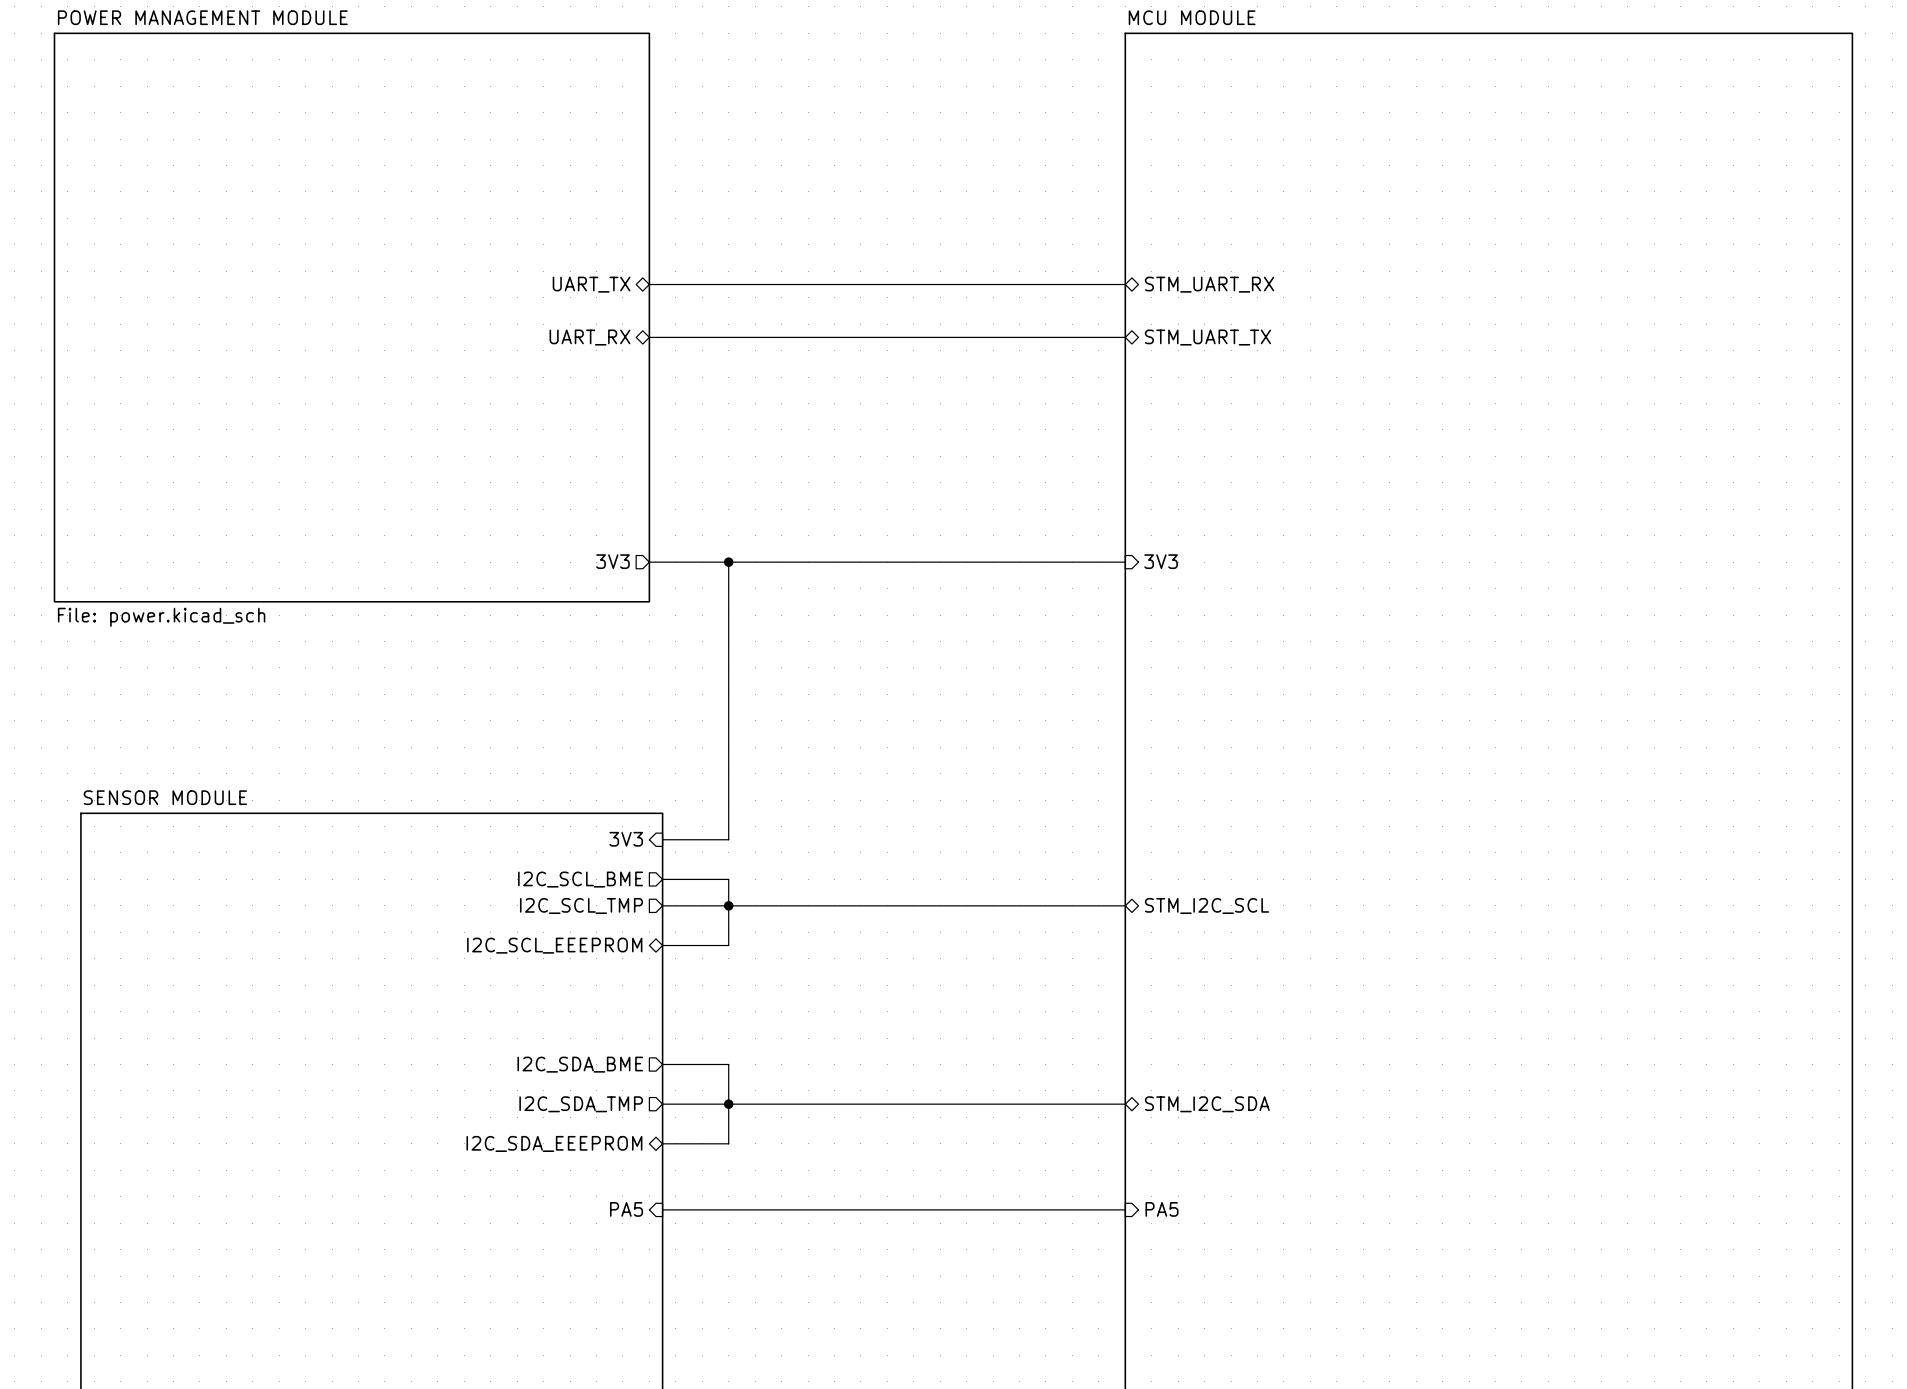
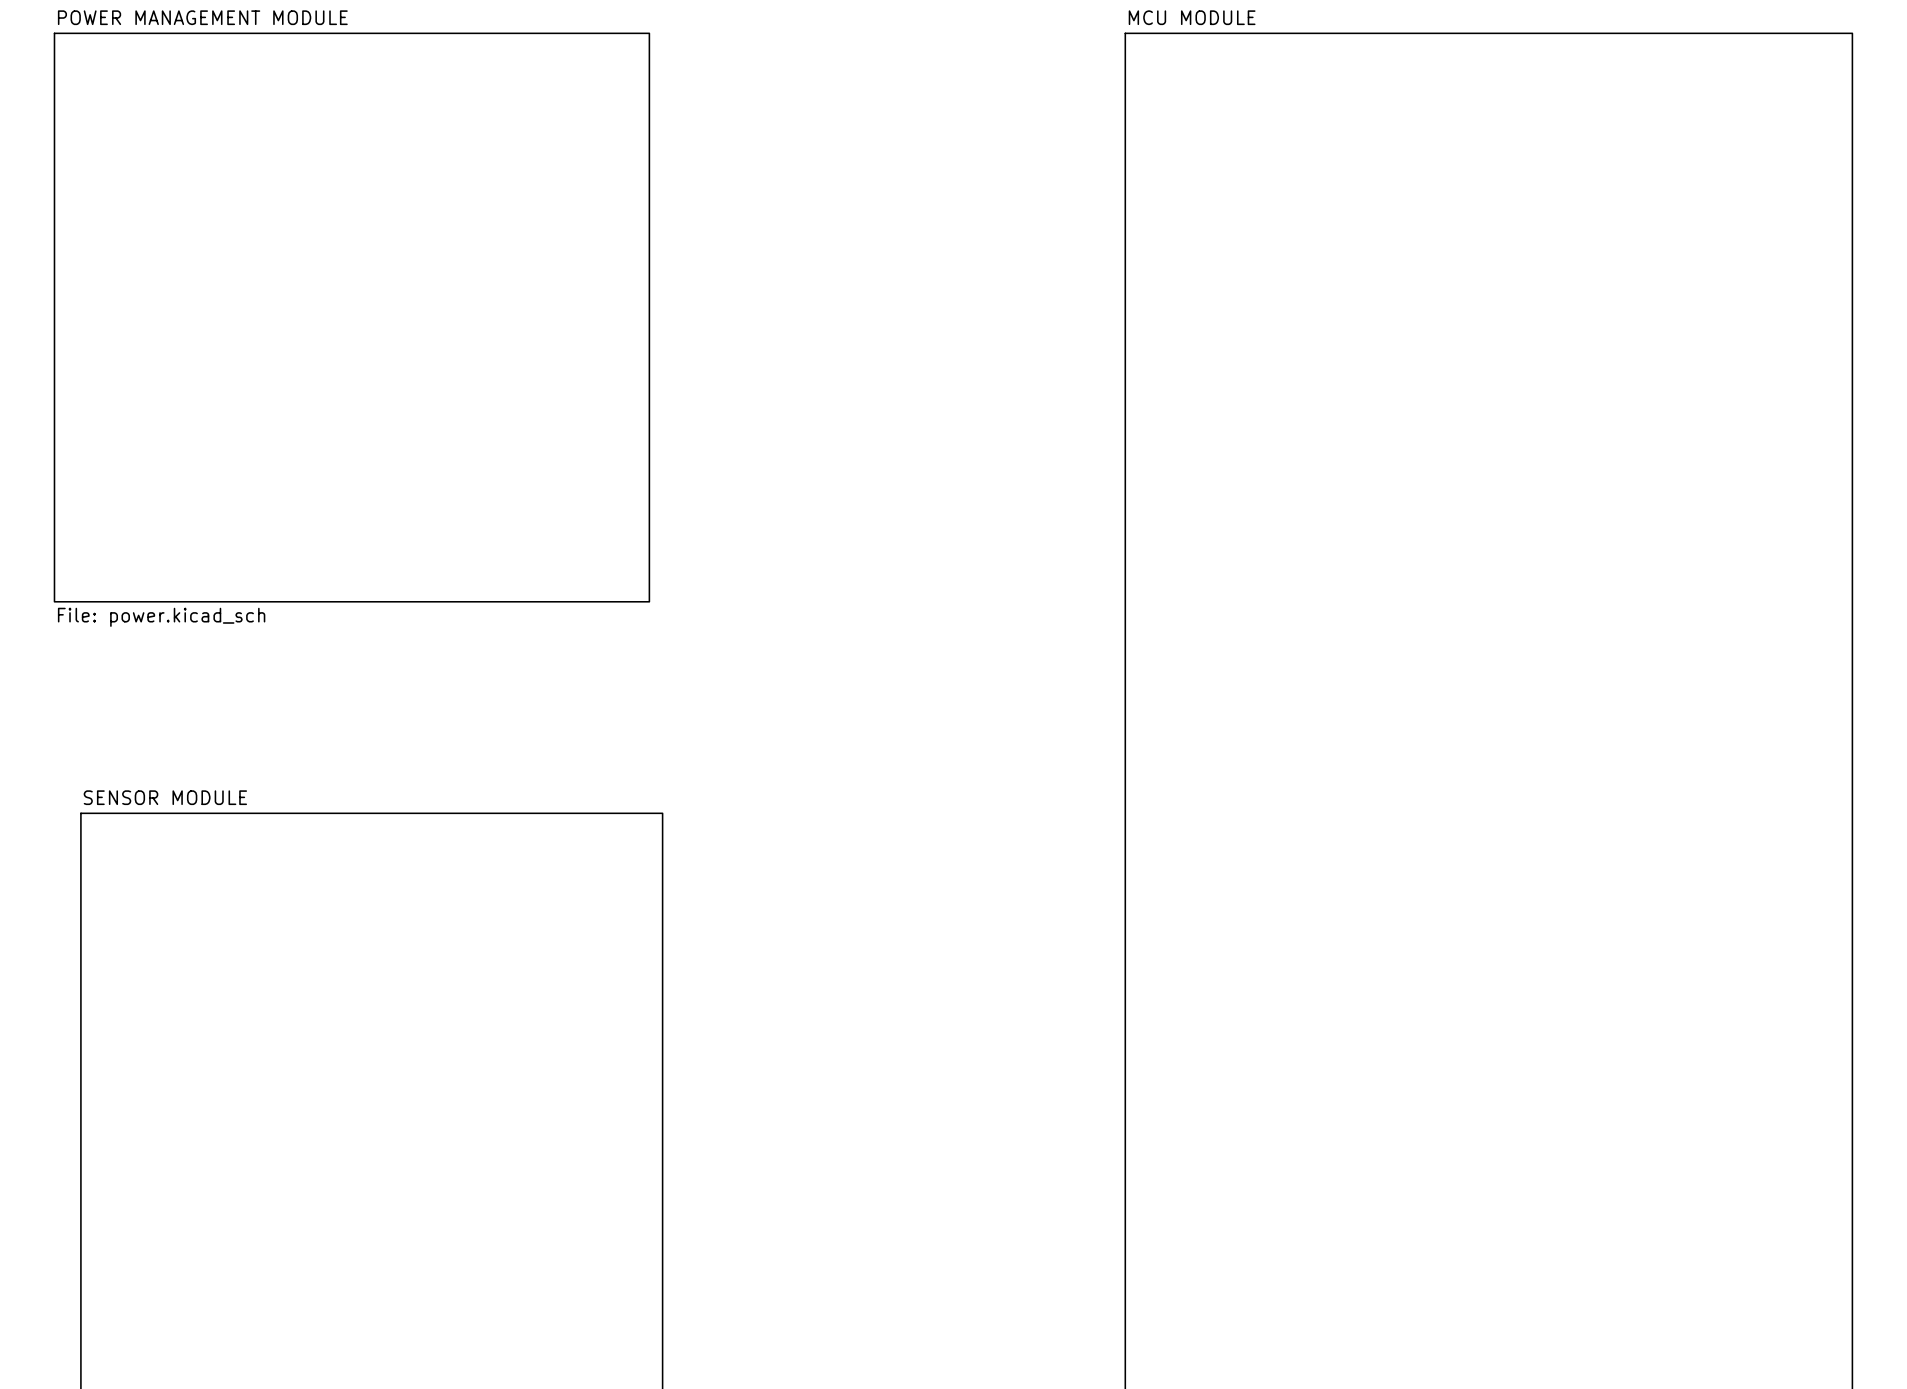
sheet pin: UART_TX (591, 284) -> none
wire: (649, 284) (1125, 284) -> none
sheet pin: STM_UART_RX (1209, 284) -> none
sheet pin: UART_RX (590, 337) -> none
wire: (649, 337) (1125, 337) -> none
sheet pin: STM_UART_TX (1207, 337) -> none
sheet pin: 3V3 (612, 561) -> none
sheet pin: 3V3 (1161, 561) -> none
wire: (649, 562) (1125, 562) -> none
wire: (728, 562) (728, 839) (662, 839) -> none
junction: (728, 562) -> none
sheet pin: 3V3 (626, 839) -> none
sheet pin: I2C_SCL_BME (580, 879) -> none
wire: (662, 879) (728, 879) (728, 945) (662, 945) -> none
sheet pin: I2C_SCL_TMP (581, 905) -> none
wire: (662, 905) (1125, 905) -> none
junction: (728, 905) -> none
sheet pin: STM_I2C_SCL (1207, 905) -> none
sheet pin: I2C_SCL_EEEPROM (554, 945) -> none
sheet pin: I2C_SDA_BME (580, 1064) -> none
wire: (662, 1064) (728, 1064) (728, 1143) (662, 1143) -> none
sheet pin: I2C_SDA_TMP (581, 1104) -> none
wire: (662, 1104) (1125, 1104) -> none
junction: (728, 1104) -> none
sheet pin: STM_I2C_SDA (1207, 1104) -> none
sheet pin: I2C_SDA_EEEPROM (554, 1143) -> none
sheet pin: PA5 (626, 1209) -> none
wire: (662, 1209) (1125, 1209) -> none
sheet pin: PA5 (1162, 1209) -> none

